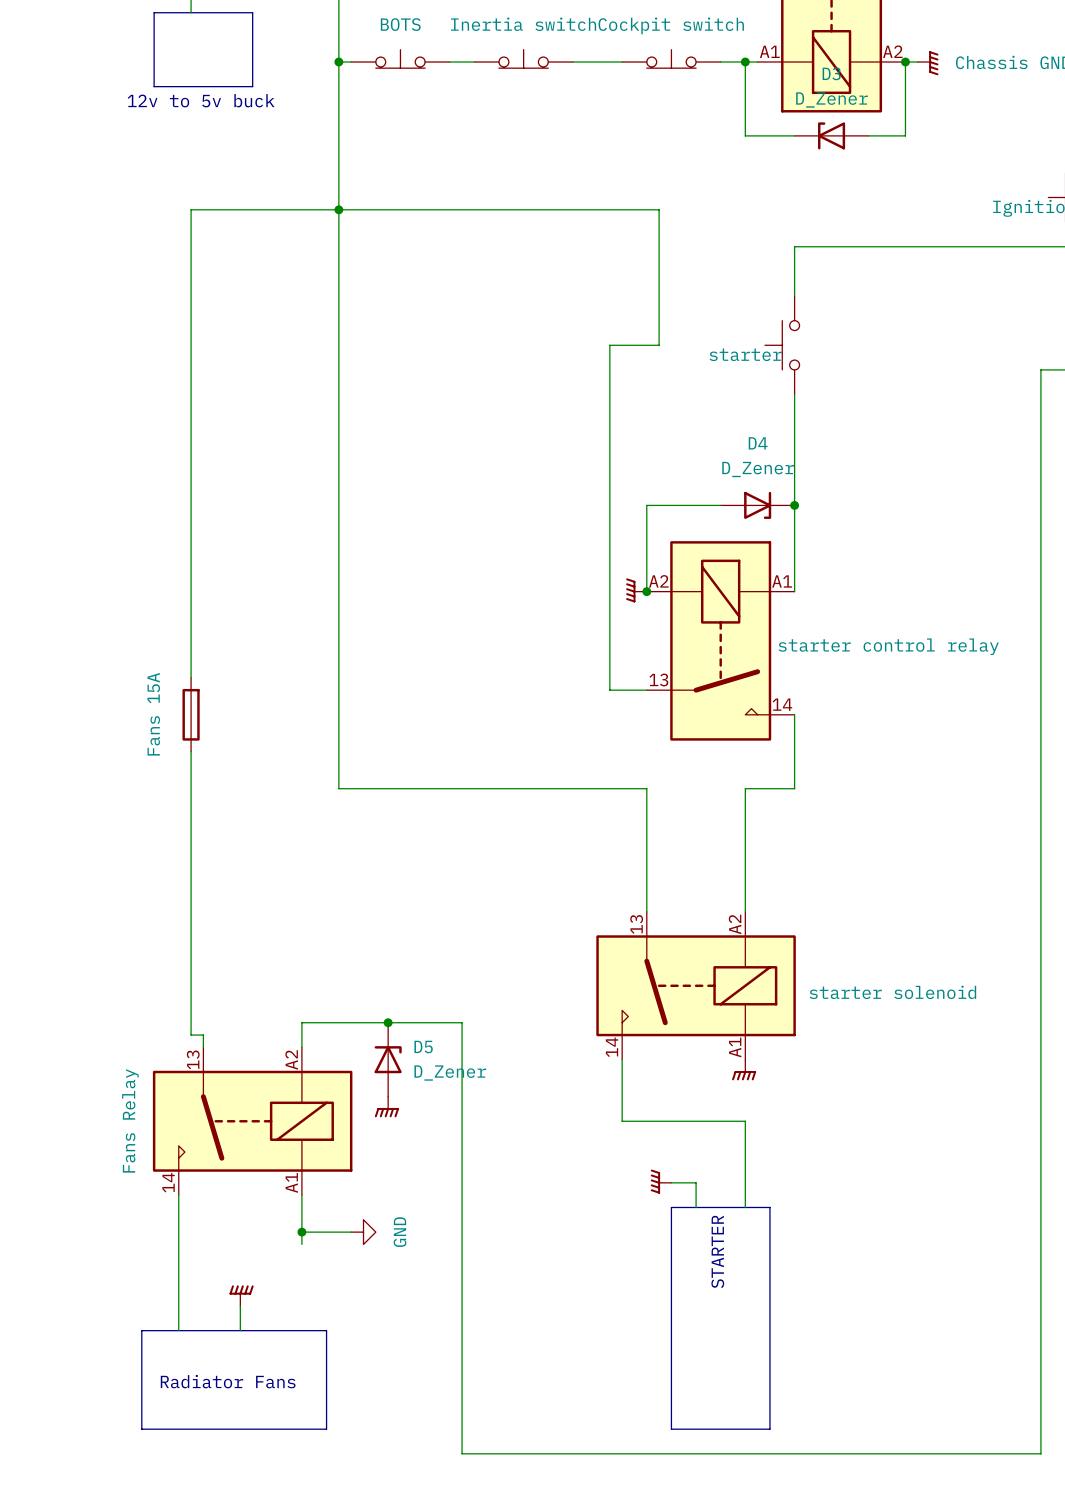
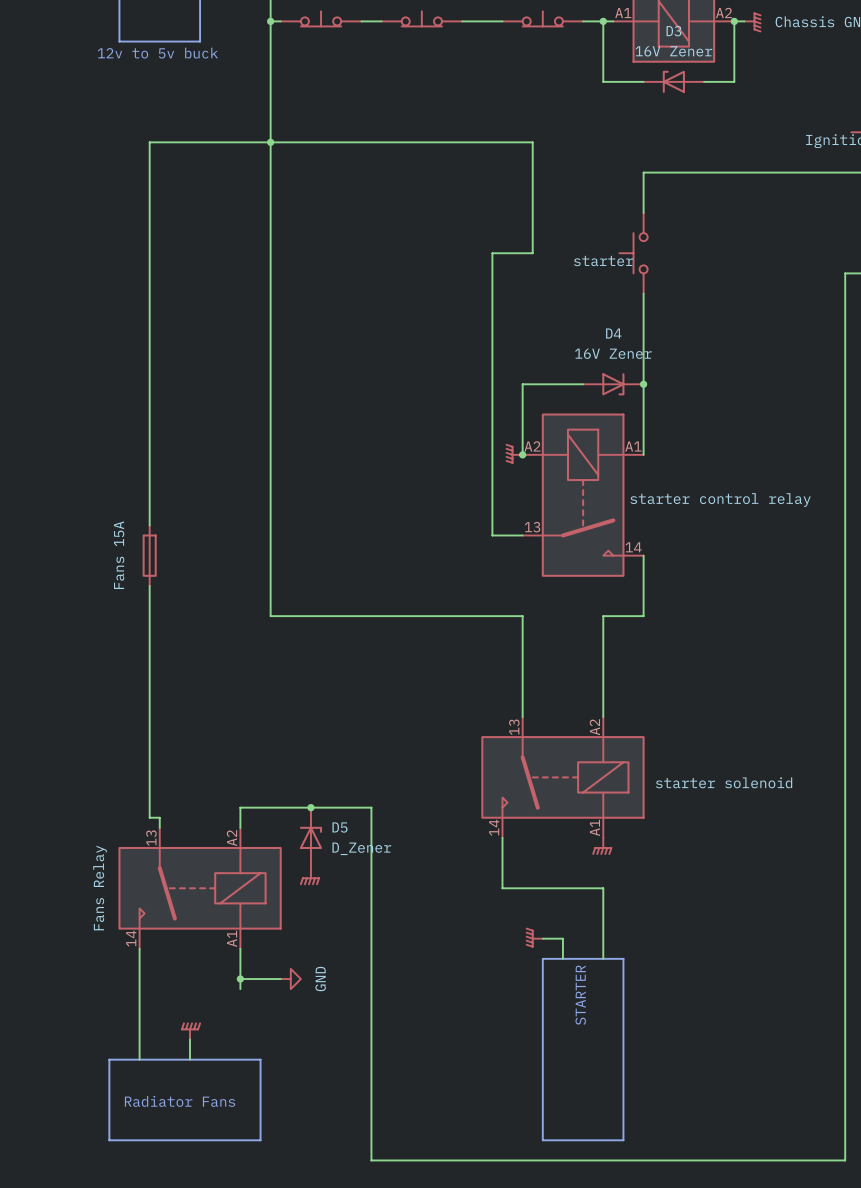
D3 value: D_Zener (832, 99) -> 16V Zener (673, 51)
D4 value: D_Zener (758, 469) -> 16V Zener (613, 353)

